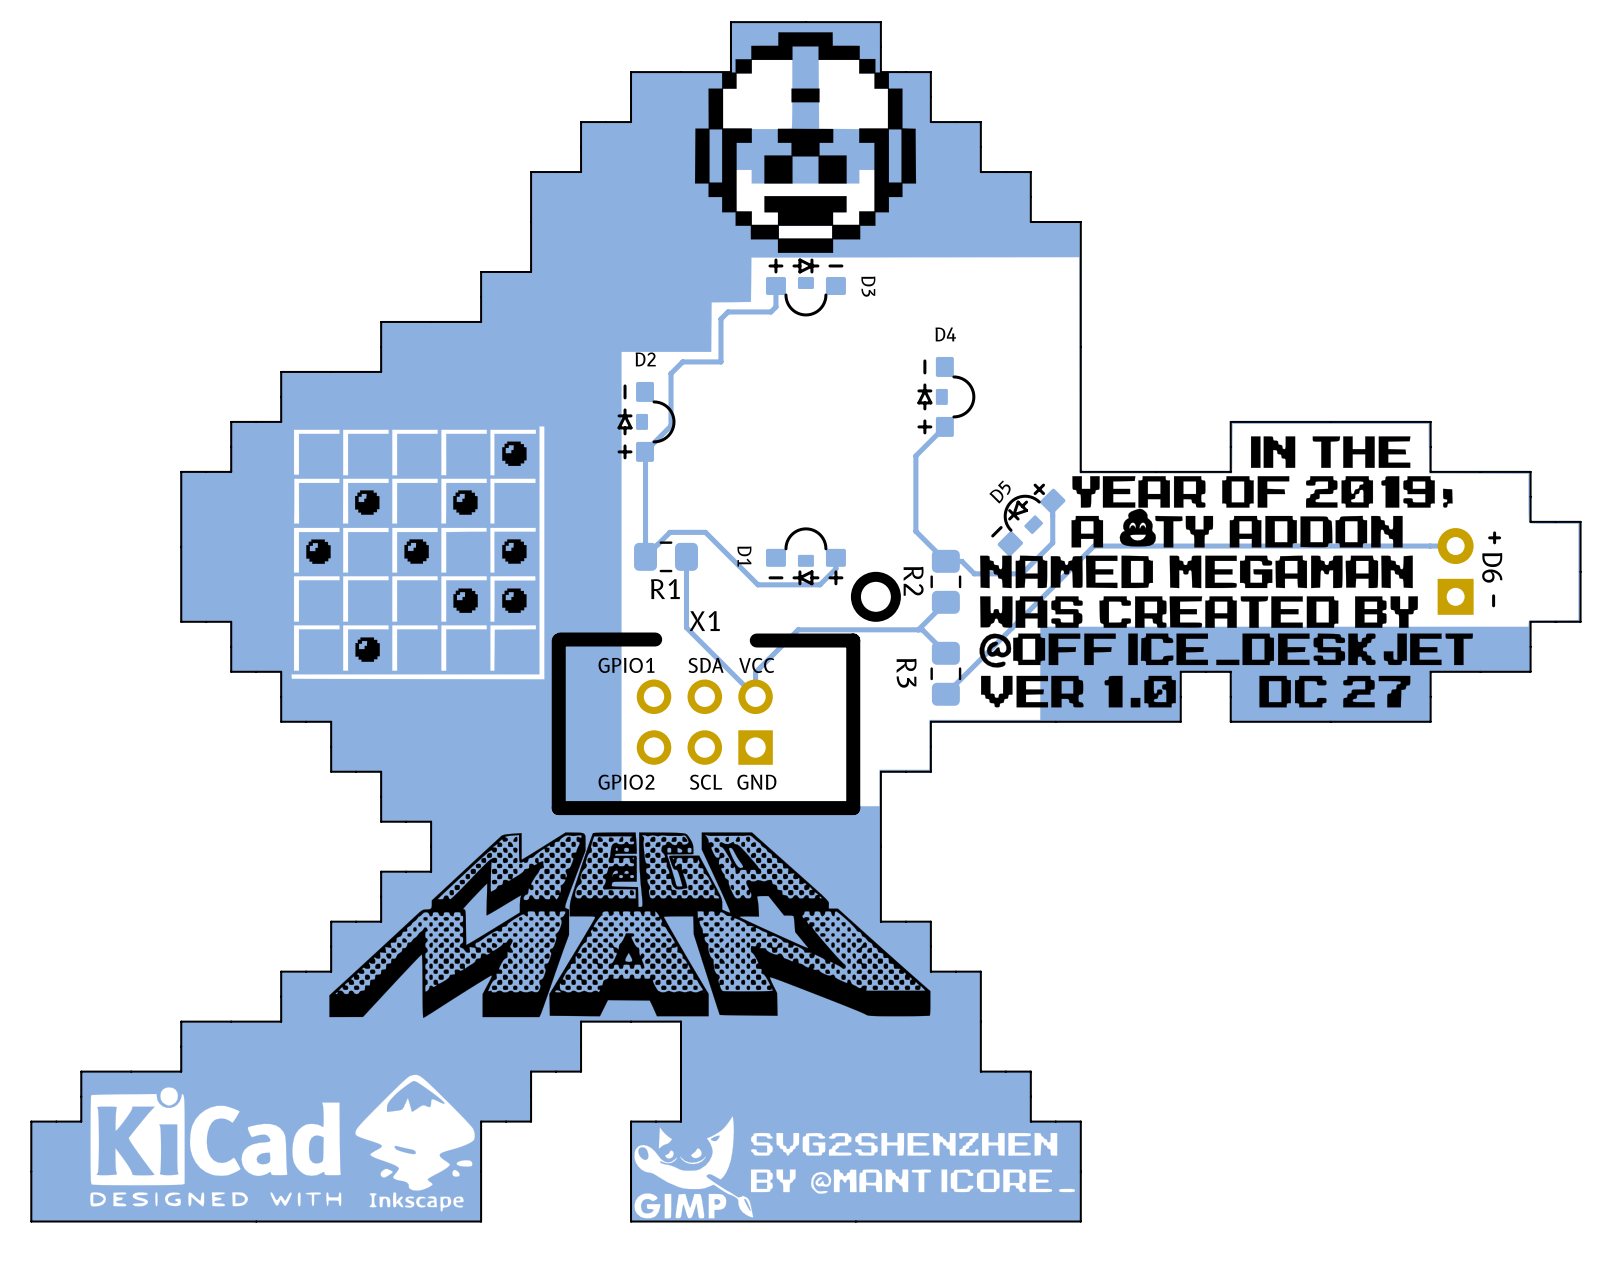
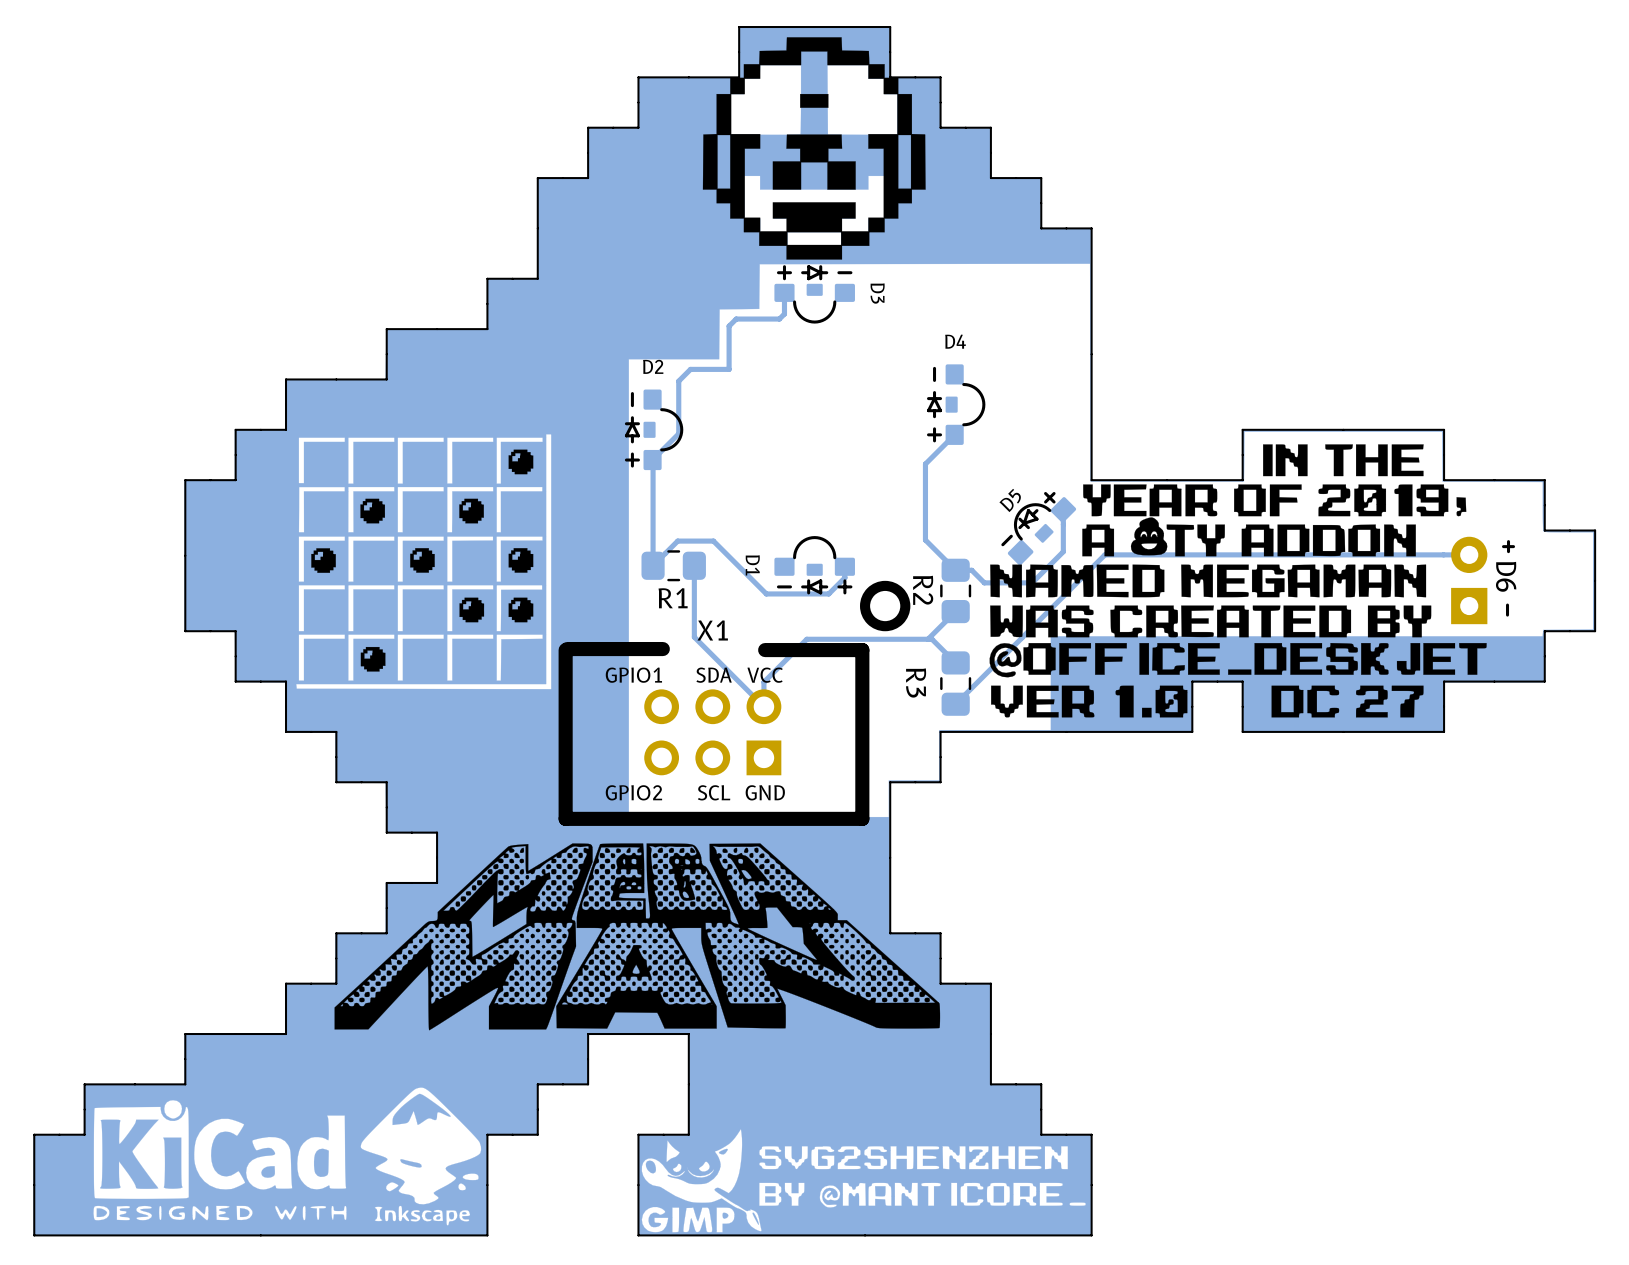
drawing shape: [306, 32, 1473, 1018] -> [311, 37, 1487, 1031]

